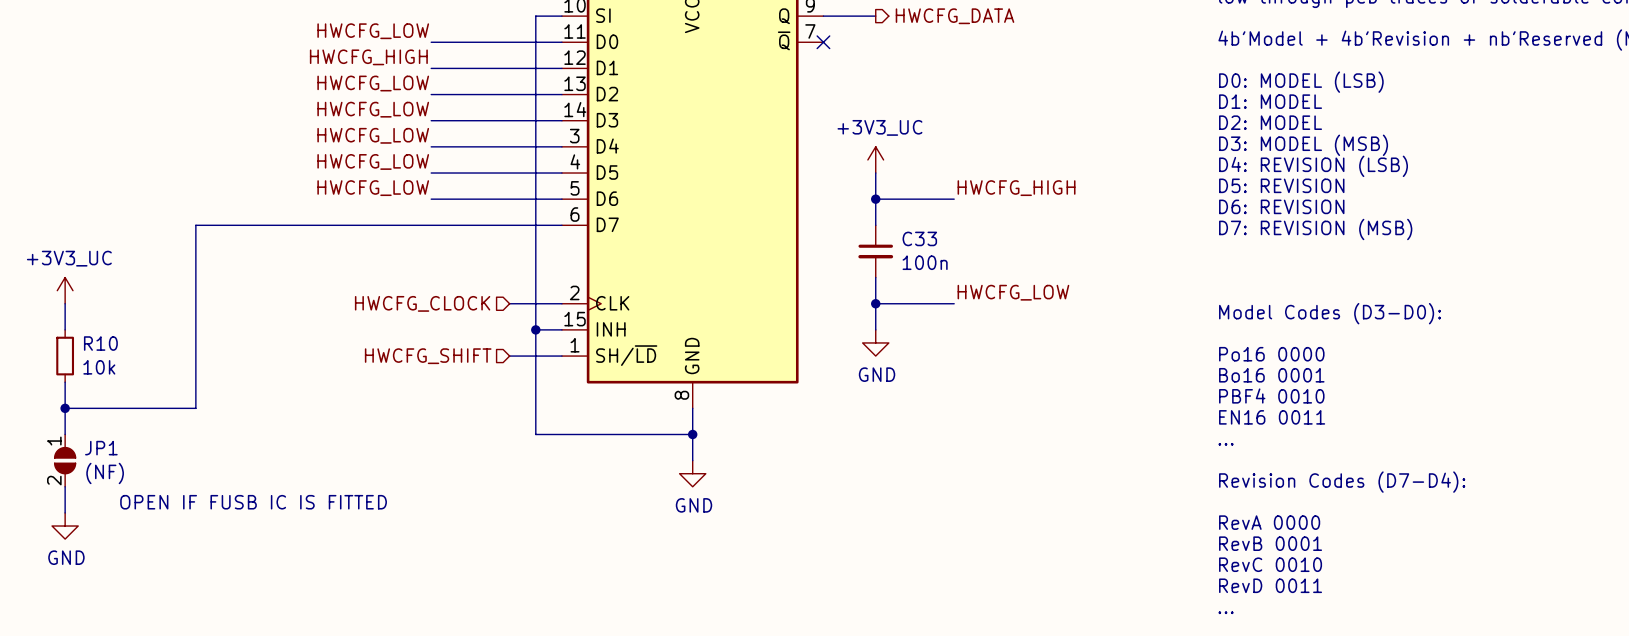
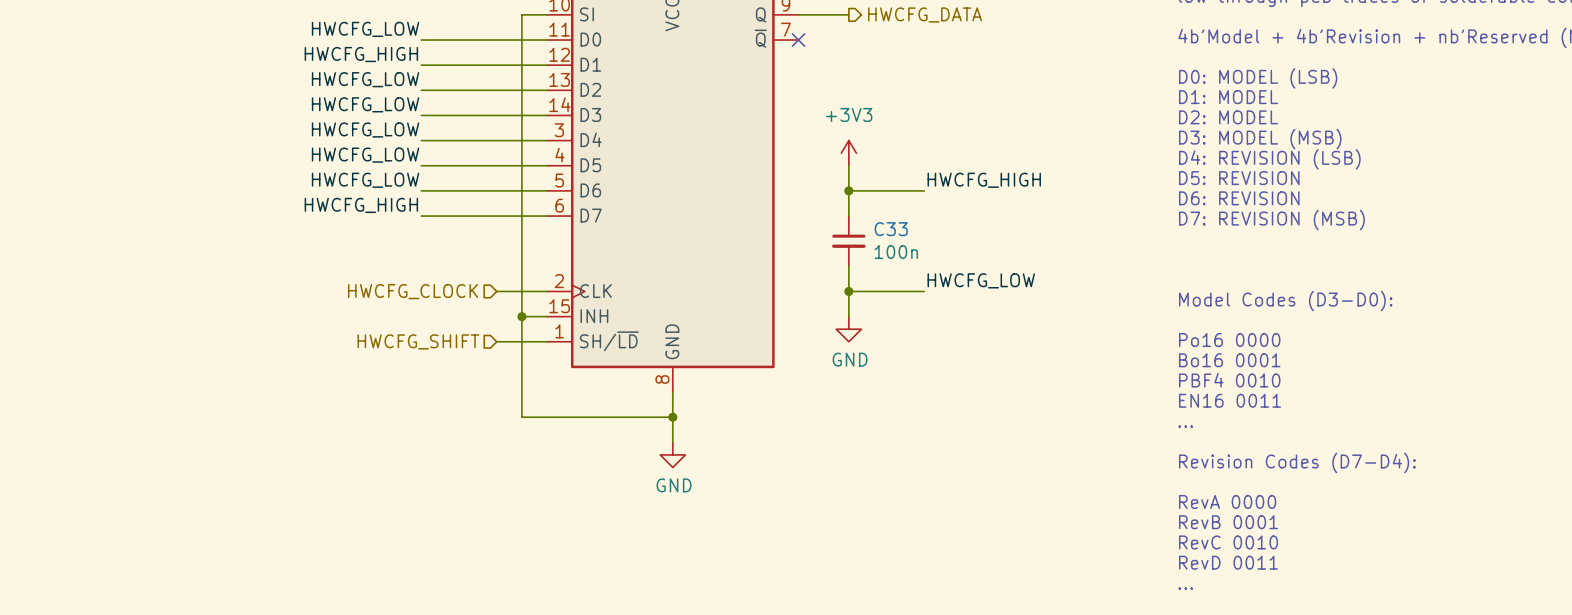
power symbol: +3V3_UC (875, 159) -> +3V3 (848, 153)
label: none -> HWCFG_HIGH (361, 205)
wire: (431, 225) (195, 225) (195, 408) (65, 408) -> none
power symbol: +3V3_UC (65, 290) -> none
wire: (65, 303) (65, 329) -> none
R10: 10k (65, 356) -> none
wire: (65, 382) (65, 434) -> none
junction: (65, 408) -> none
JP1: (NF) (65, 460) -> none
wire: (65, 486) (65, 512) -> none
text: OPEN IF FUSB IC IS FITTED (253, 502) -> none
power symbol: GND (65, 526) -> none

